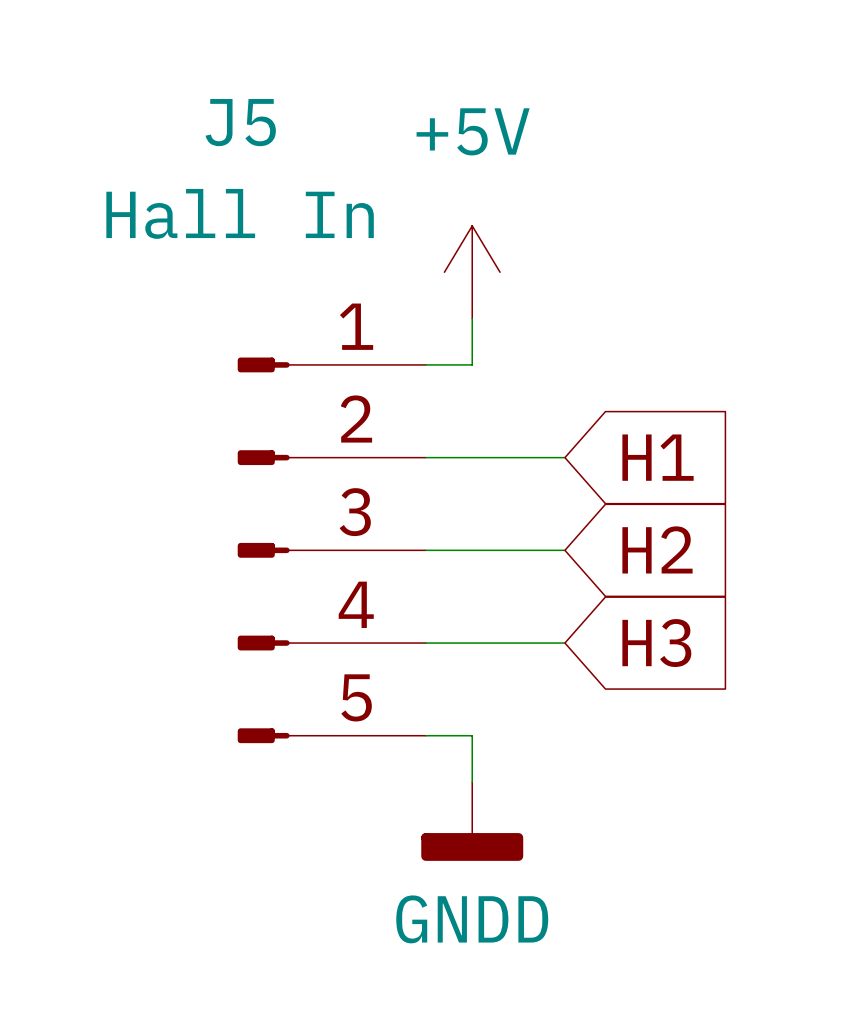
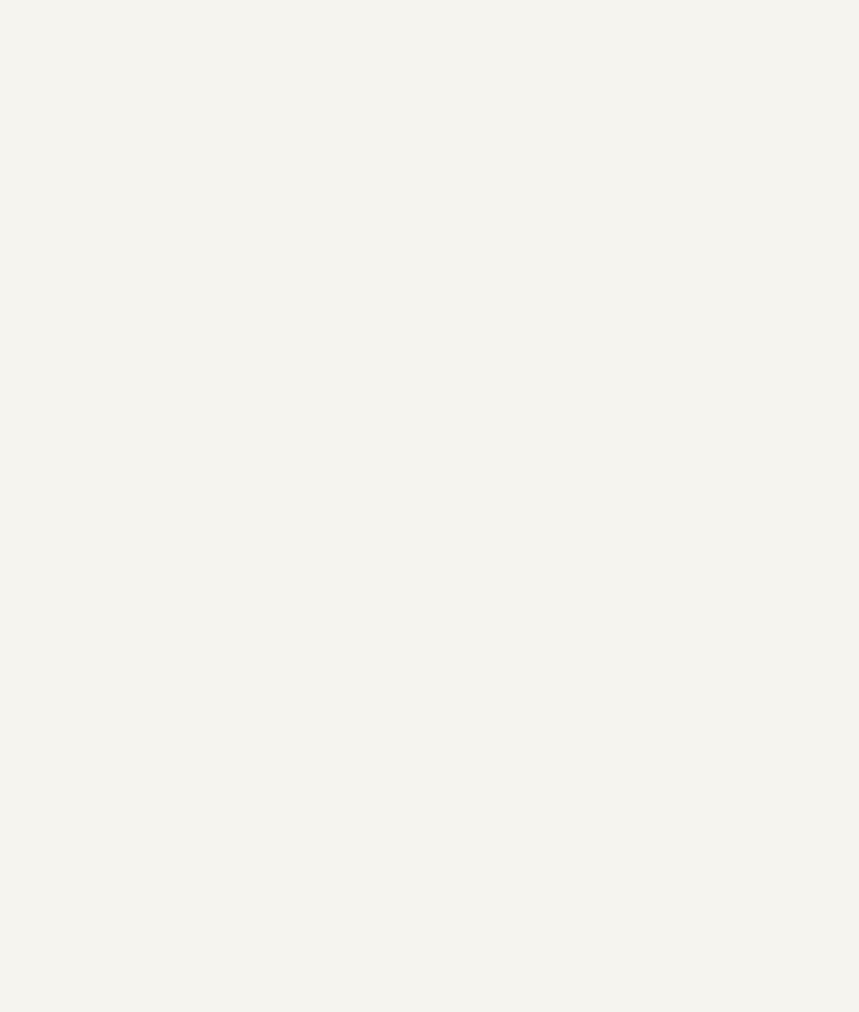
power symbol: +5V (472, 272) -> none
wire: (472, 318) (472, 364) (425, 364) -> none
wire: (425, 457) (564, 457) -> none
global label: H1 (658, 457) -> none
global label: H2 (657, 549) -> none
J5: Hall In (331, 550) -> none
wire: (425, 550) (564, 550) -> none
wire: (425, 643) (564, 643) -> none
global label: H3 (656, 643) -> none
wire: (425, 735) (472, 735) (472, 782) -> none
power symbol: GNDD (472, 821) -> none

